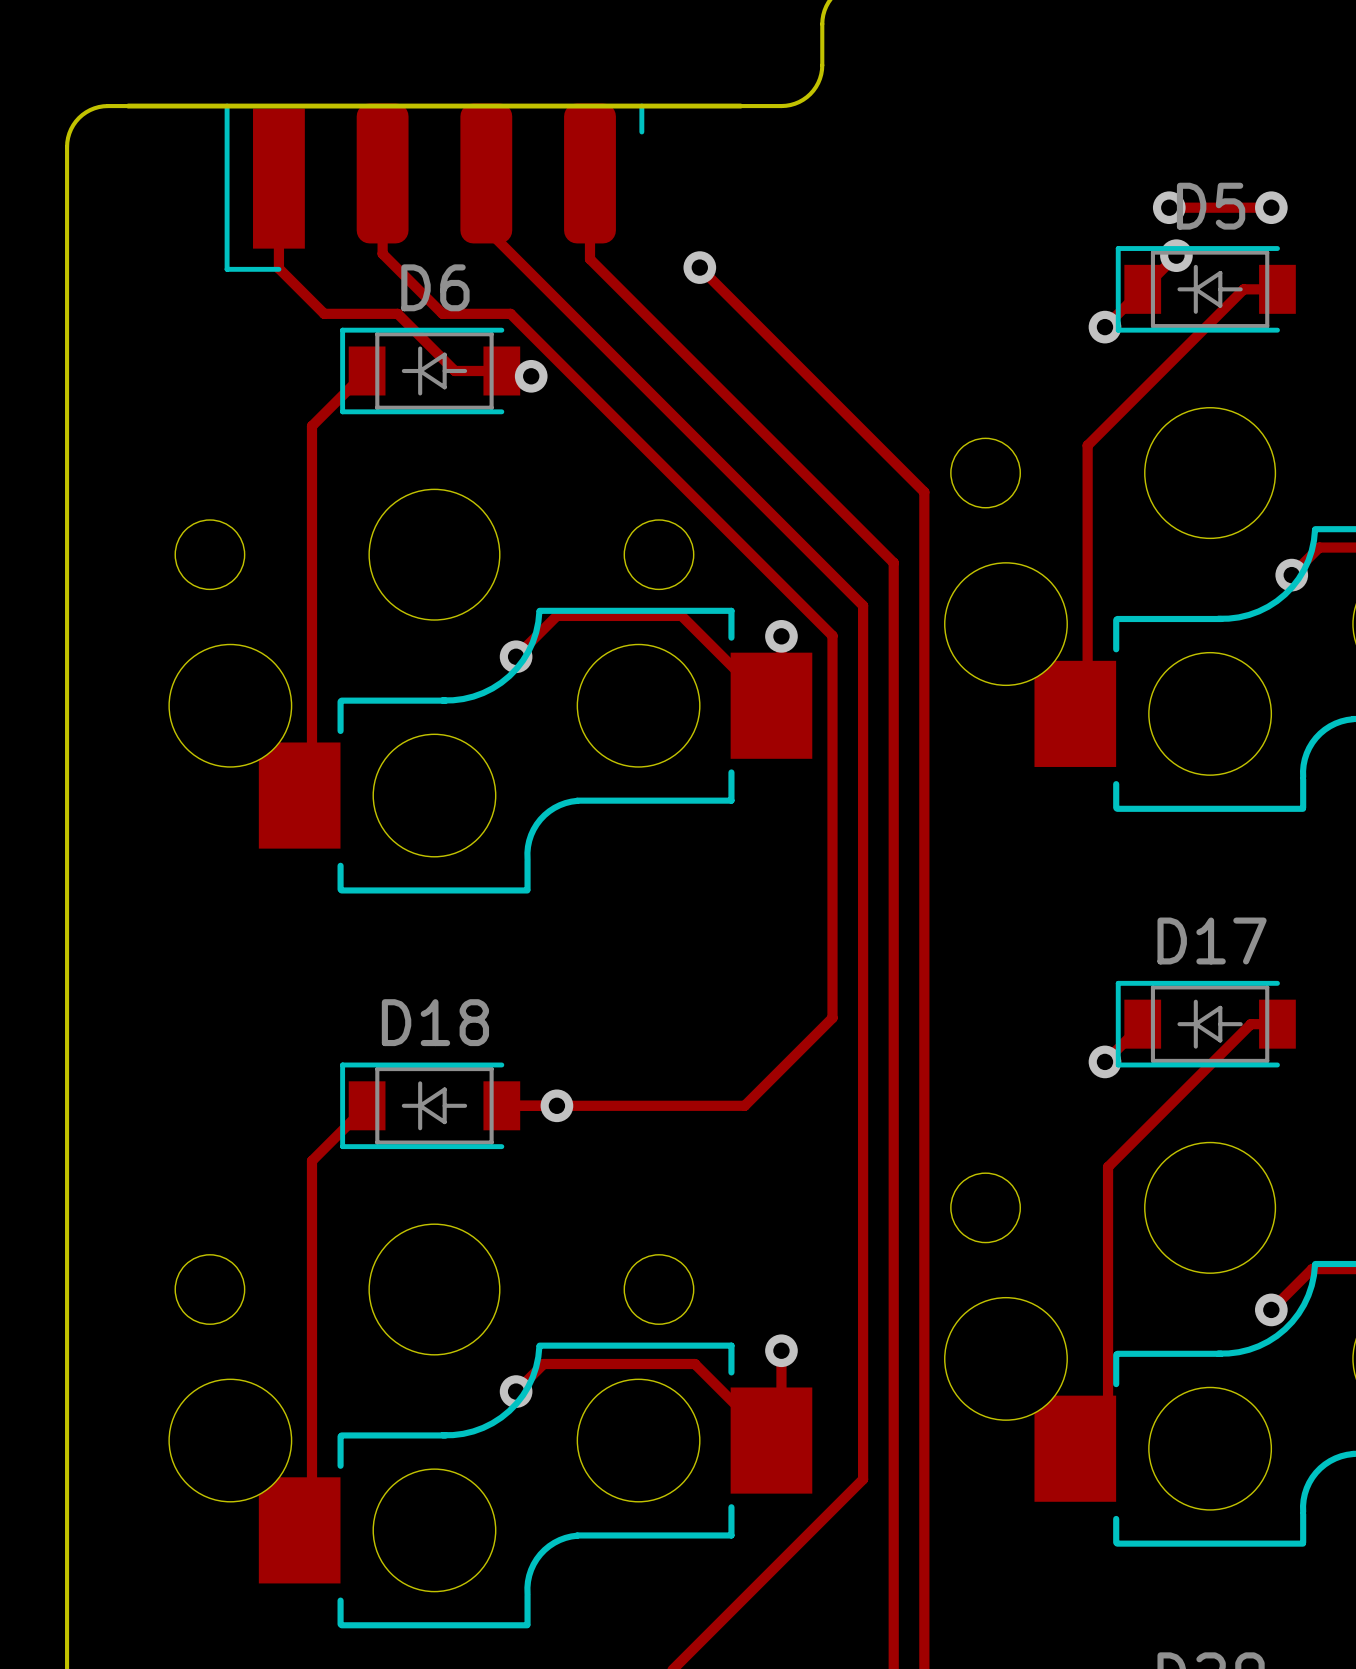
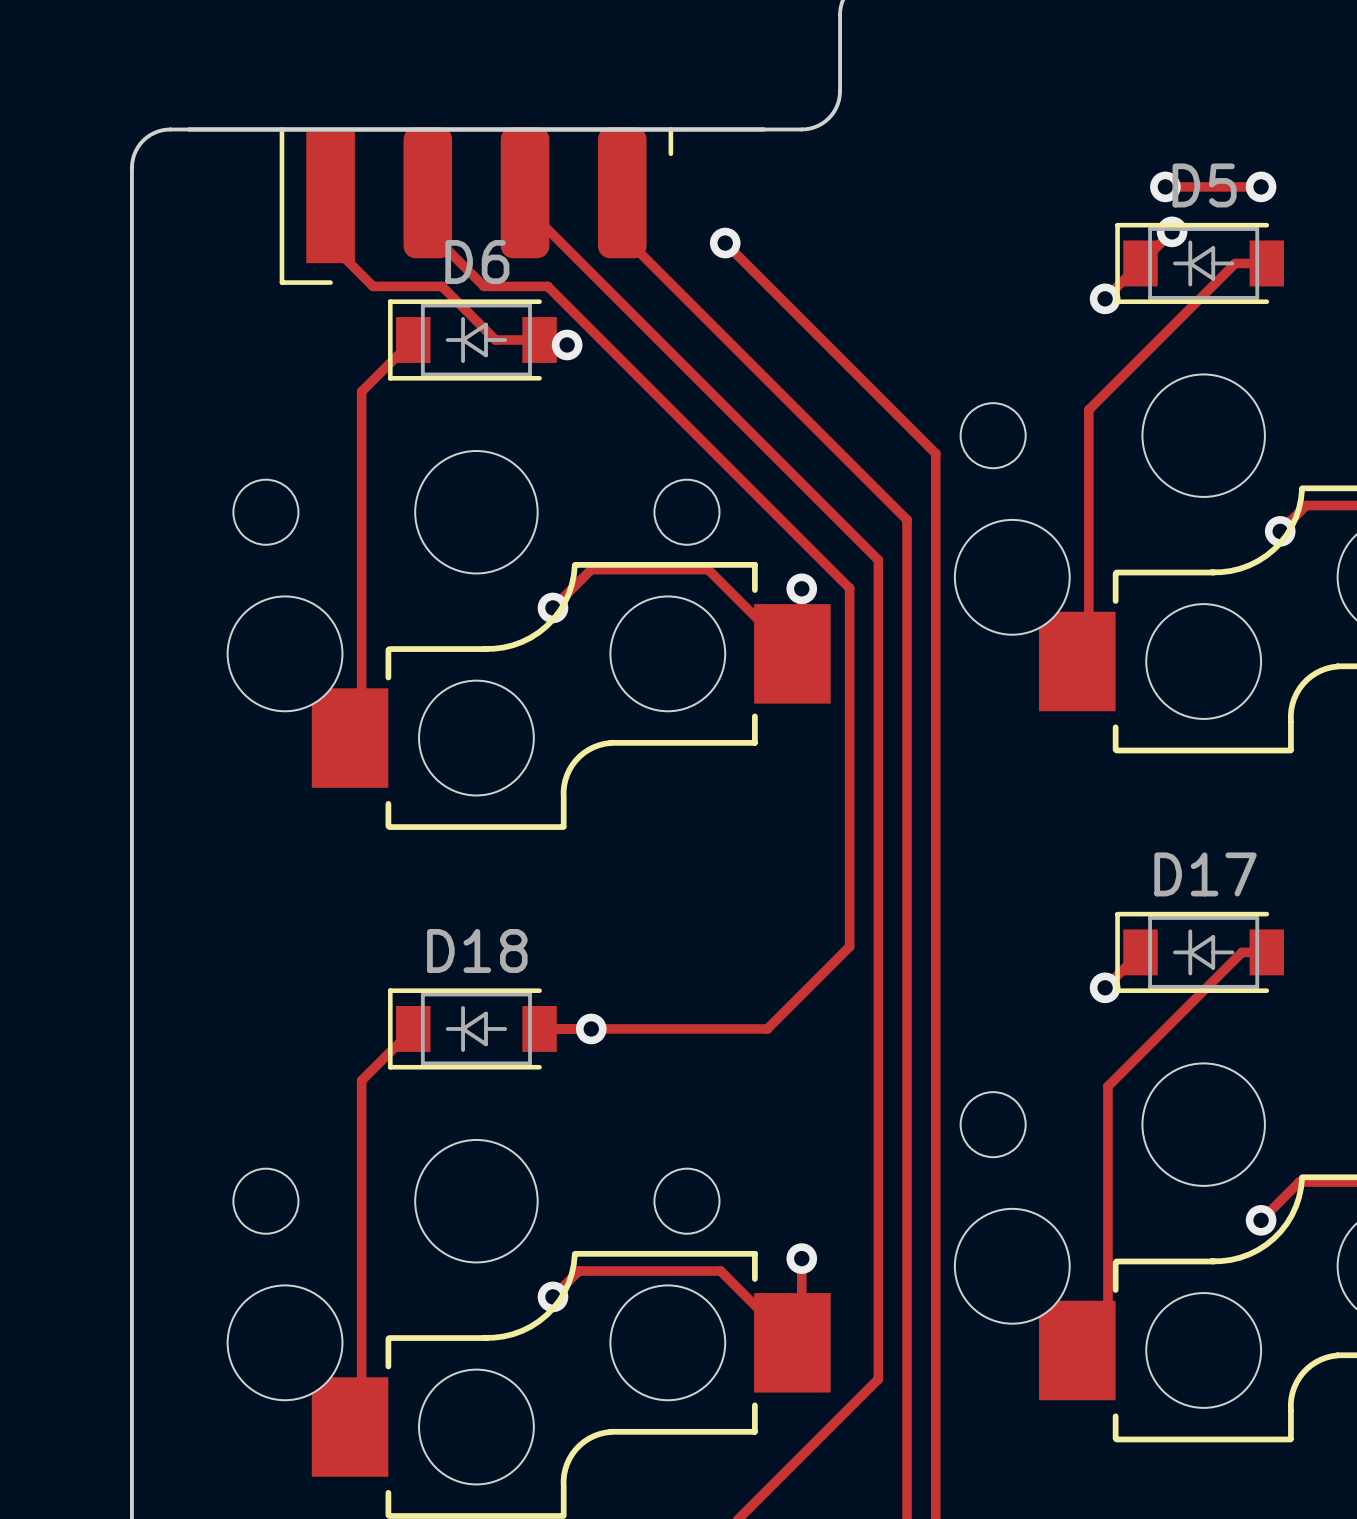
board edge: (822, 65) (819, 78) (816, 86) (810, 94) (799, 102) (786, 105) (740, 106) -> (840, 53) (839, 99) (828, 118) (810, 128) (763, 129)
board edge: (128, 106) (94, 108) (82, 114) (75, 121) (71, 129) (67, 142) (67, 187) -> (189, 129) (165, 129) (149, 135) (137, 147) (131, 167)
part position: (434, 187) -> (476, 205)

